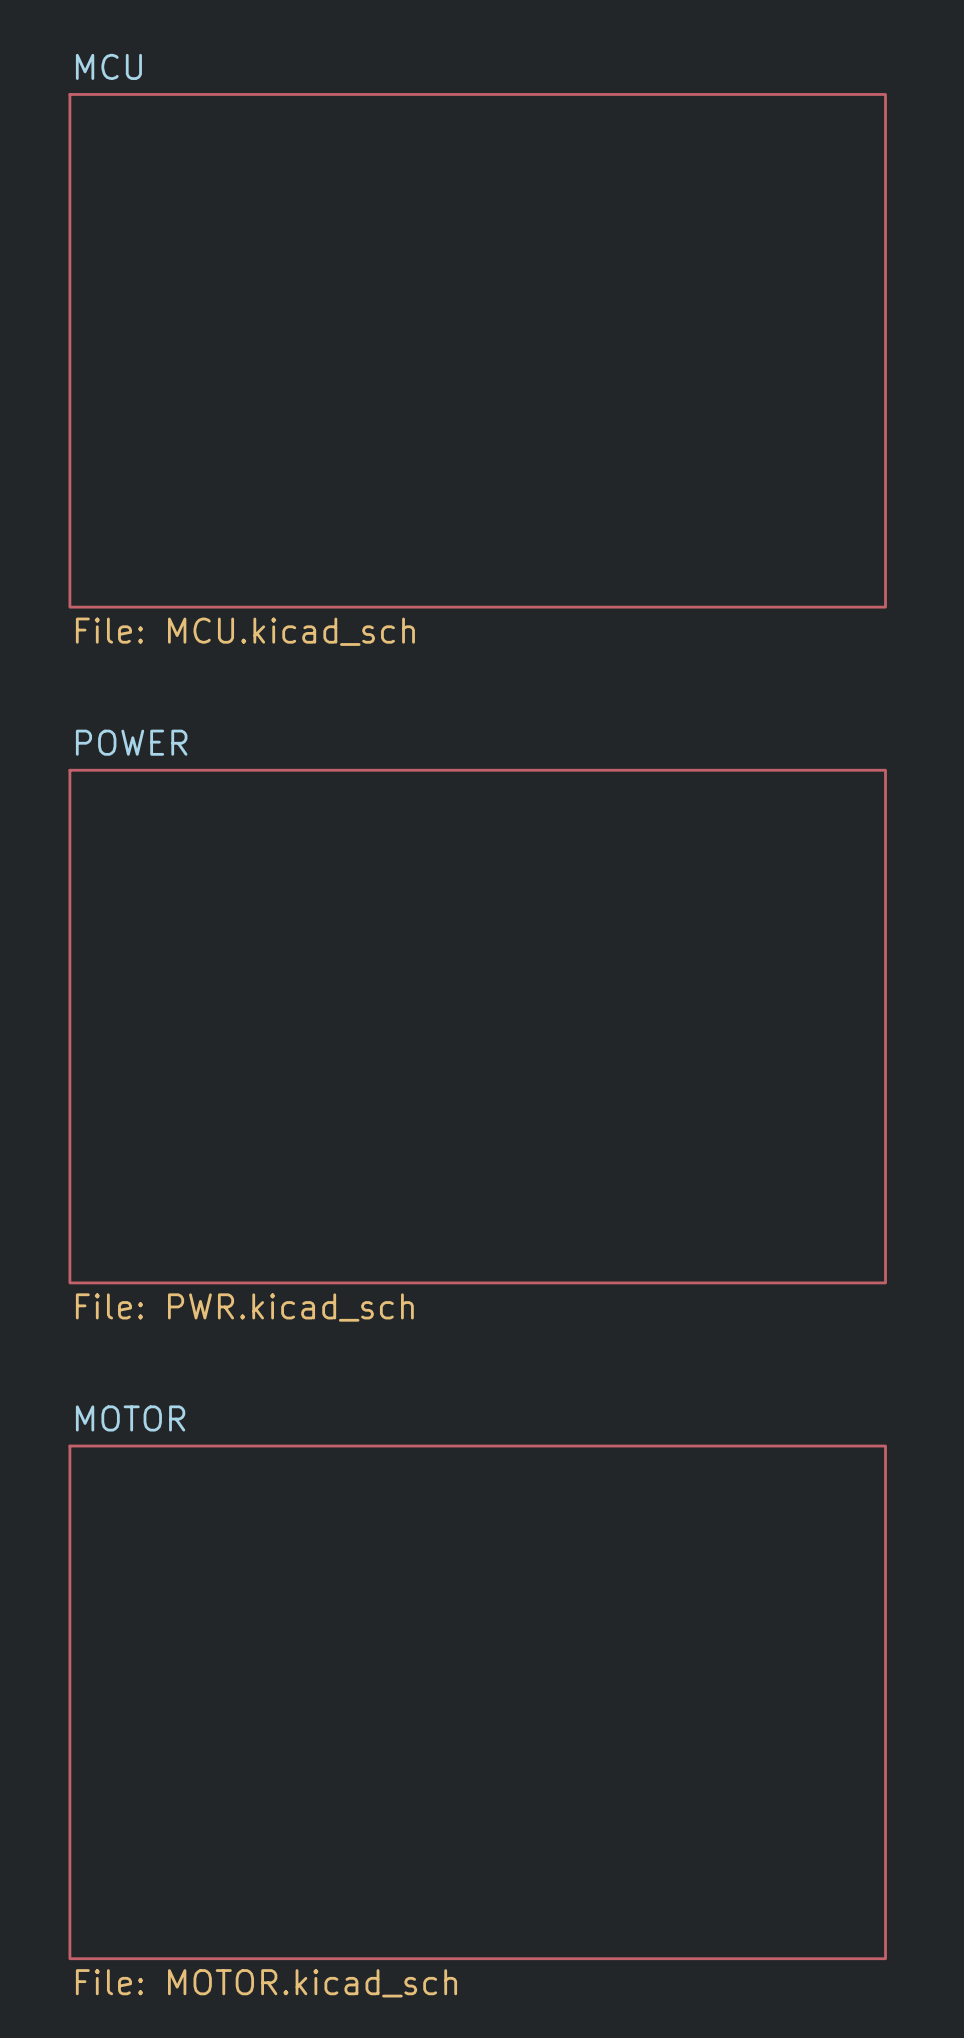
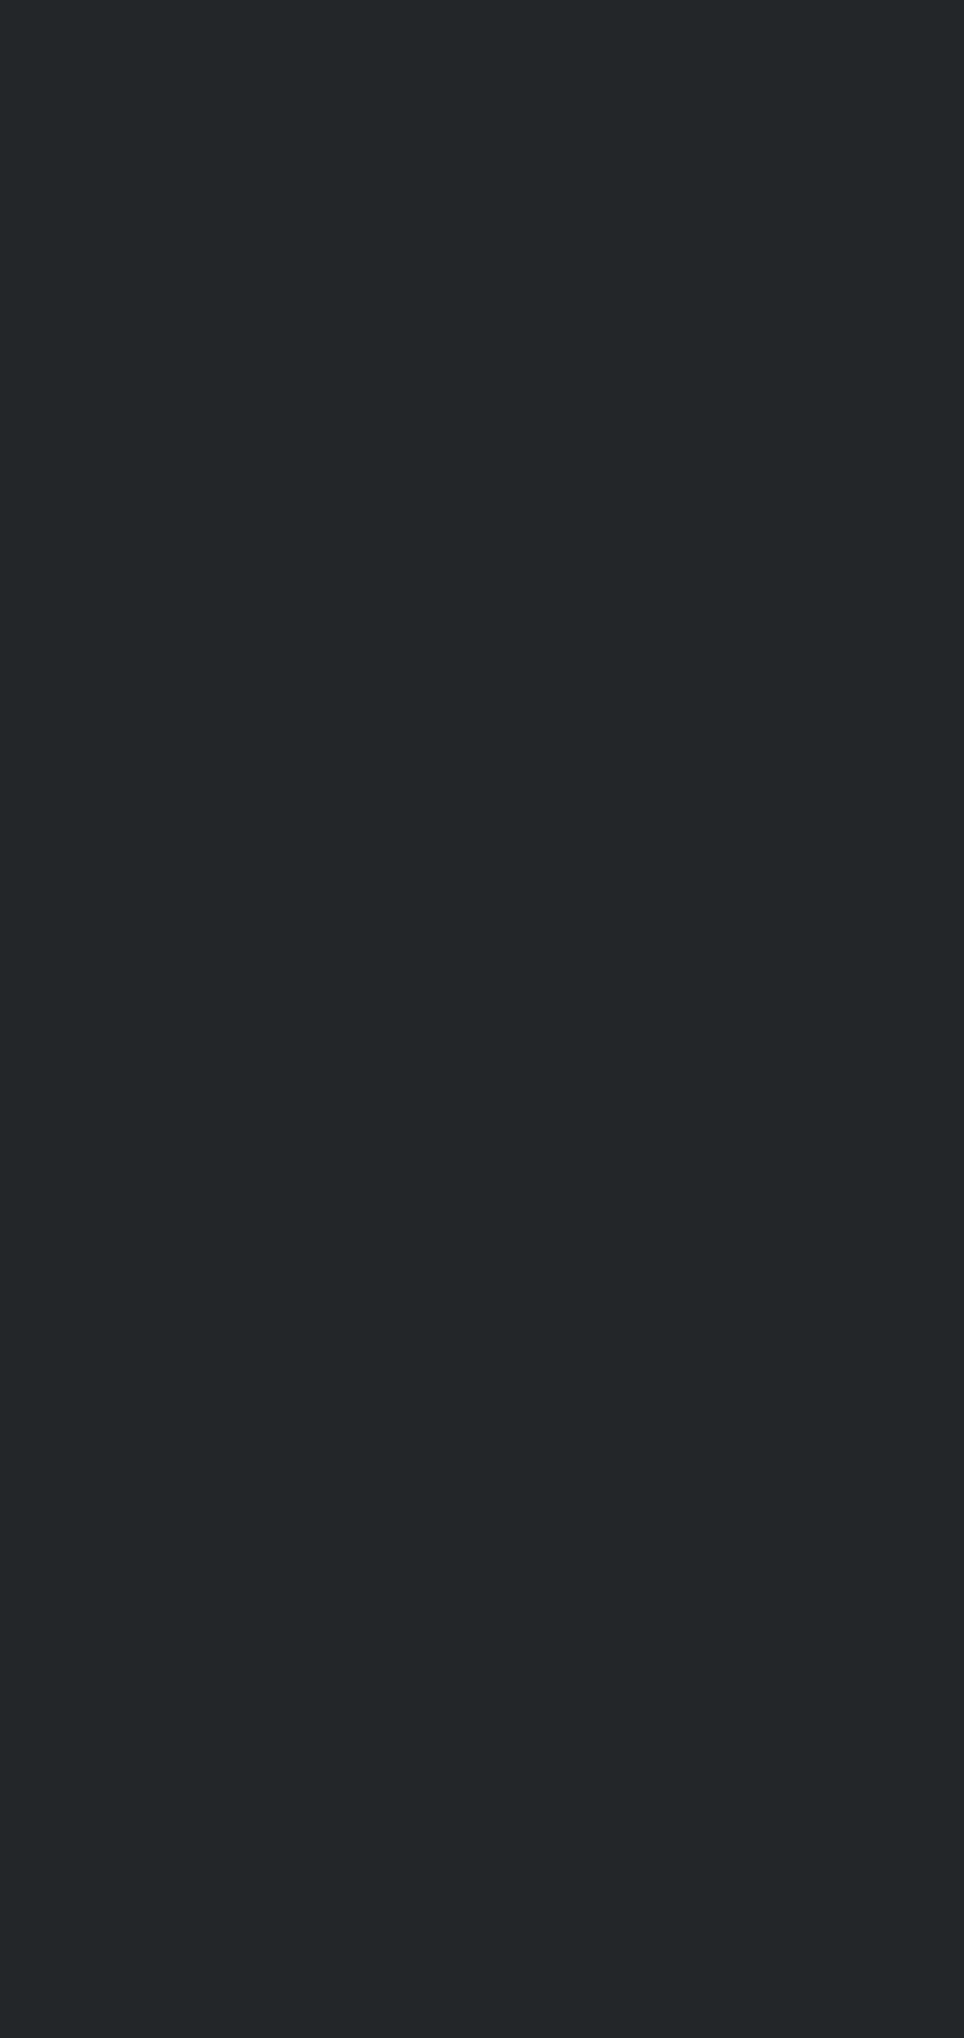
sheet MCU: File: MCU.kicad_sch (477, 350) -> none
sheet POWER: File: PWR.kicad_sch (477, 1026) -> none
sheet MOTOR: File: MOTOR.kicad_sch (477, 1702) -> none

